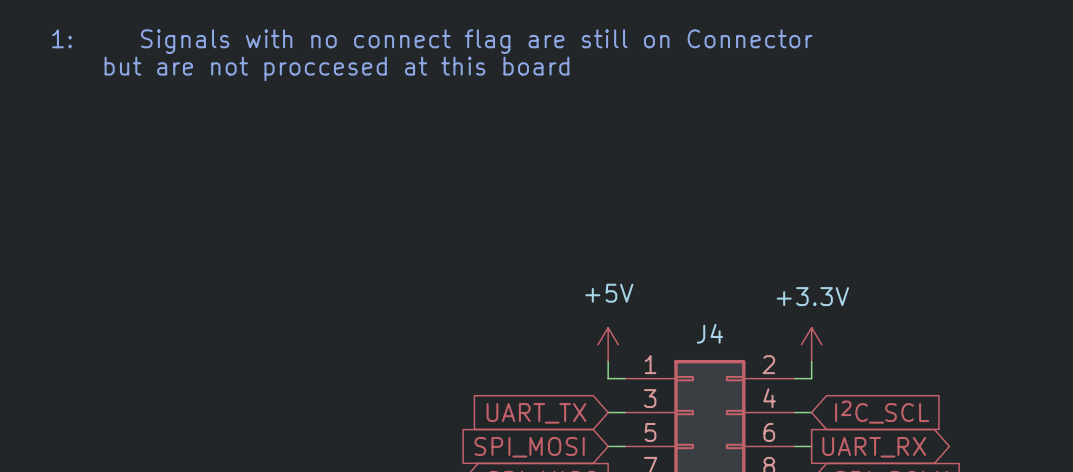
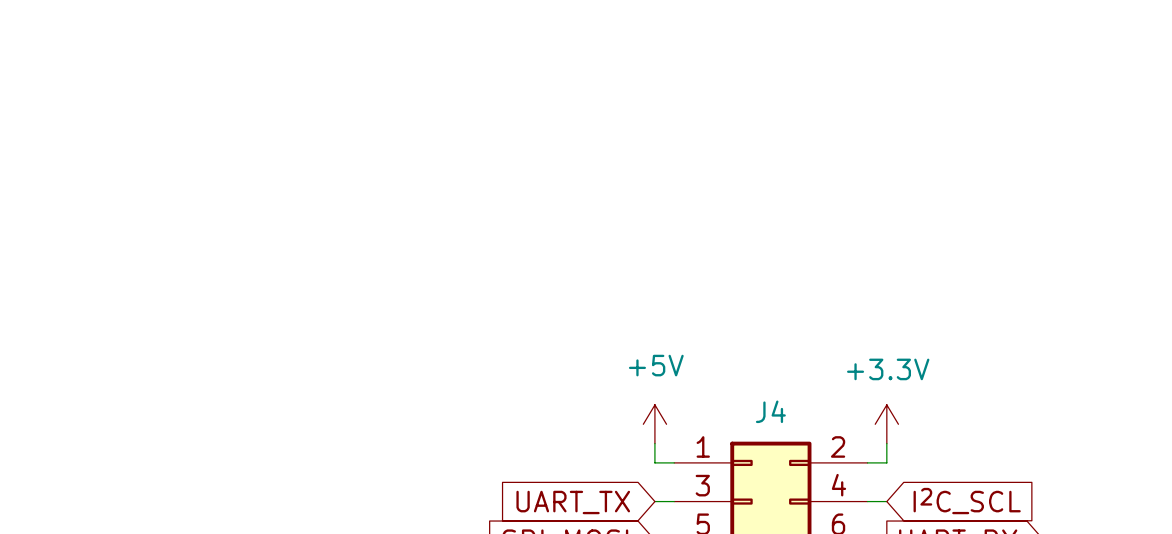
text: 1: Signals with no connect flag are still on Connector (432, 41) -> none
text: but are not proccesed at this board (336, 68) -> none

